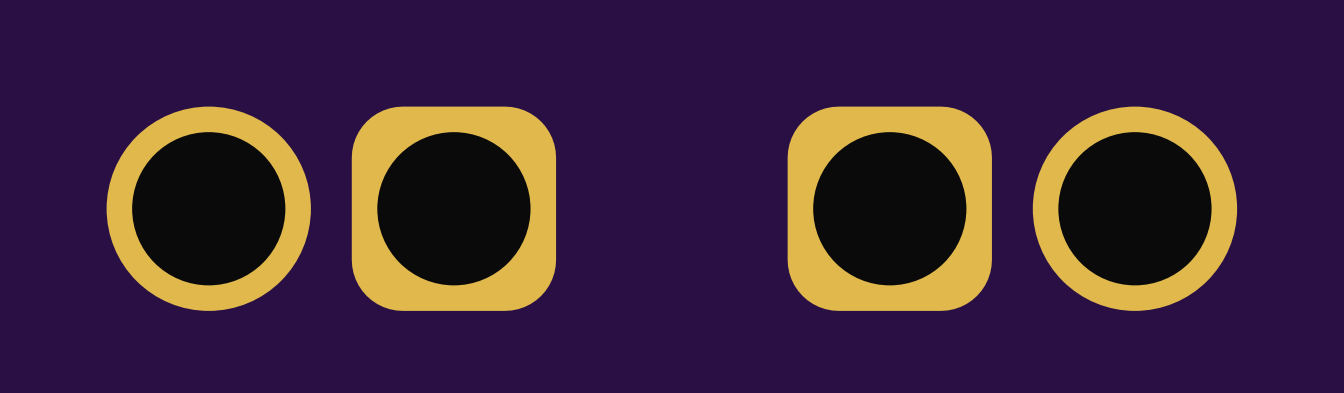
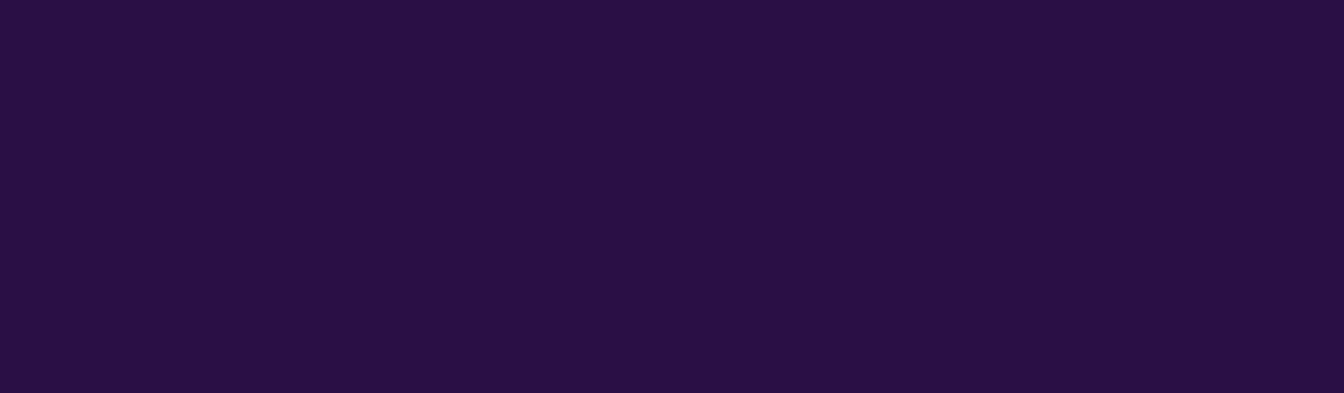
part: (331, 208) -> none
part: (1012, 208) -> none

